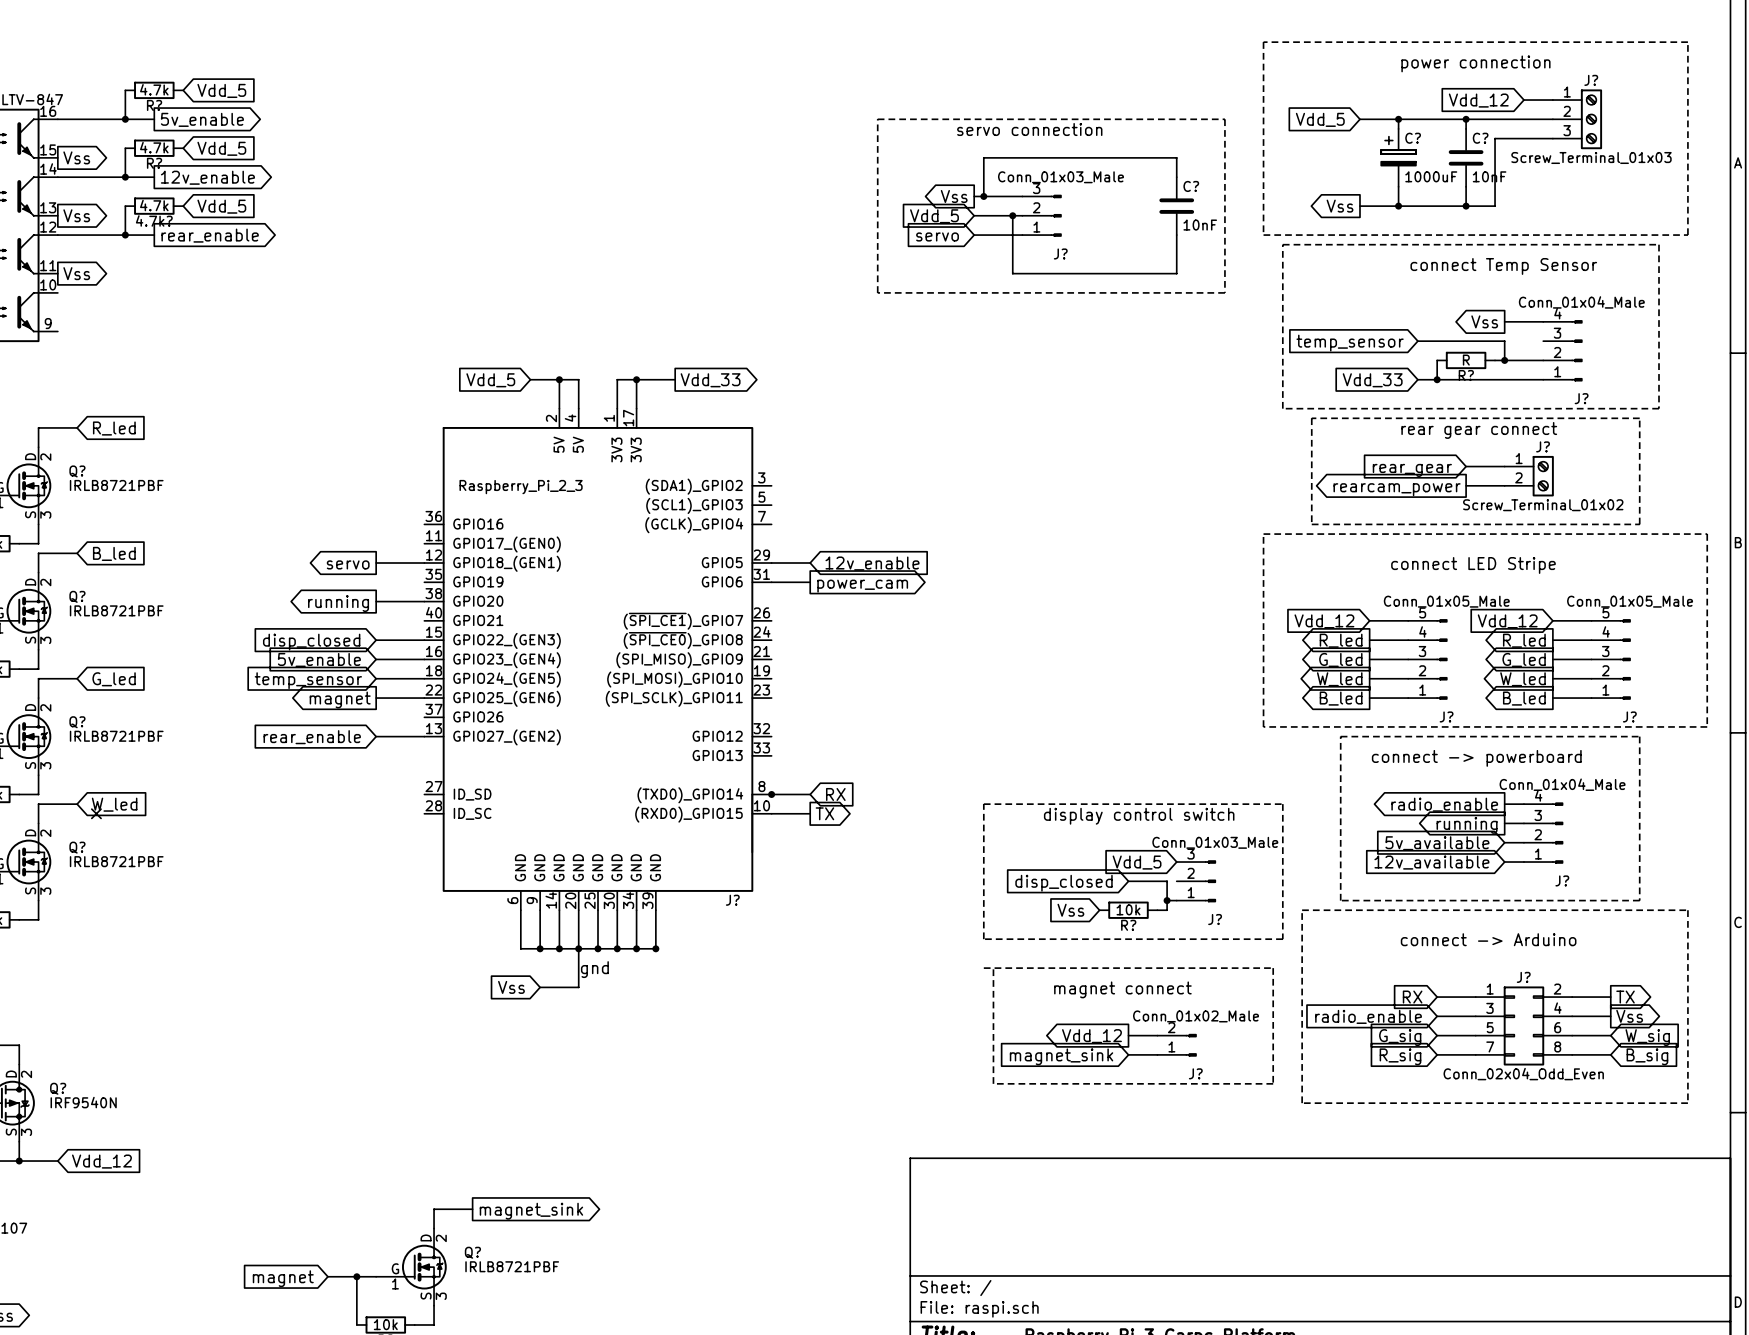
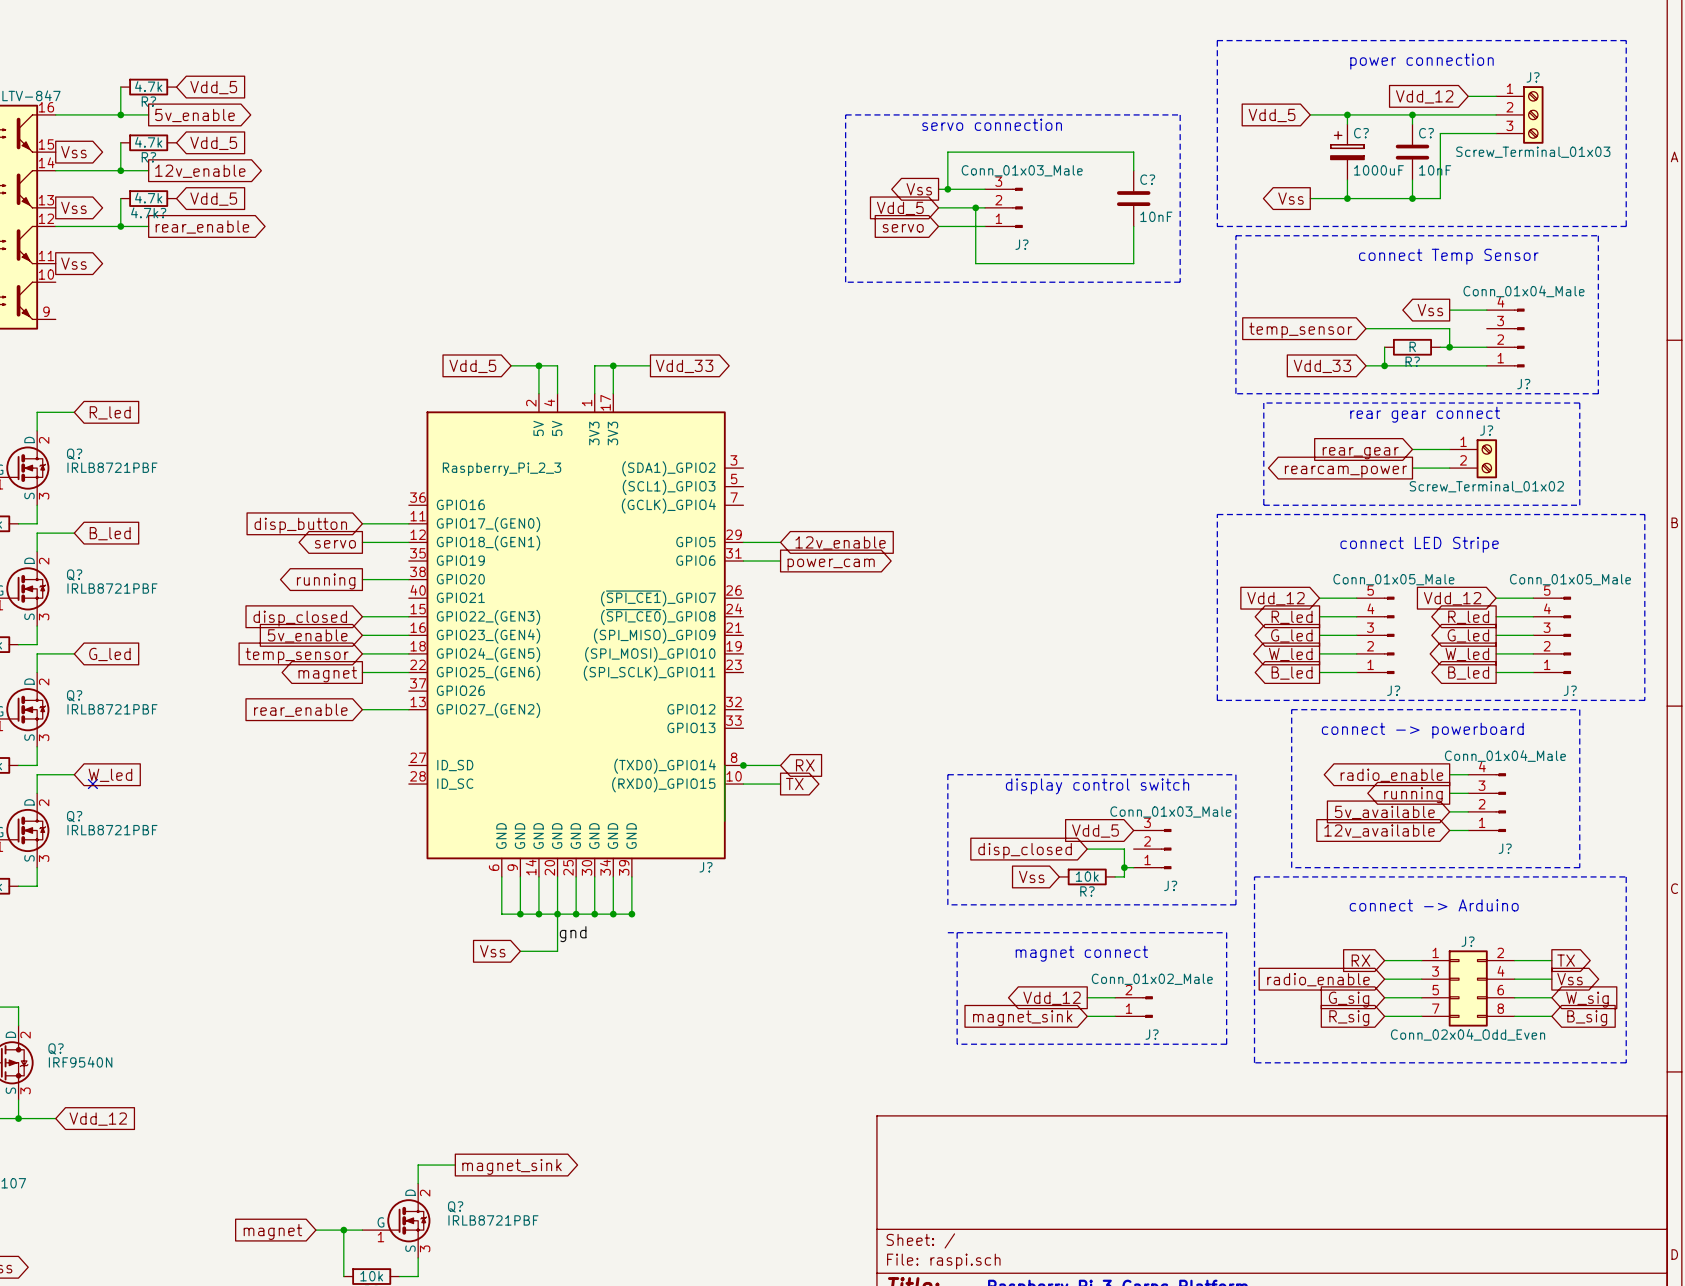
wire: none -> (362, 523) (408, 523)
global label: none -> disp_button (300, 525)

